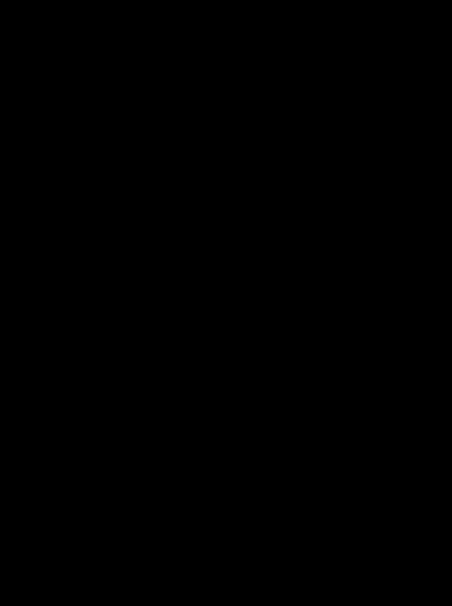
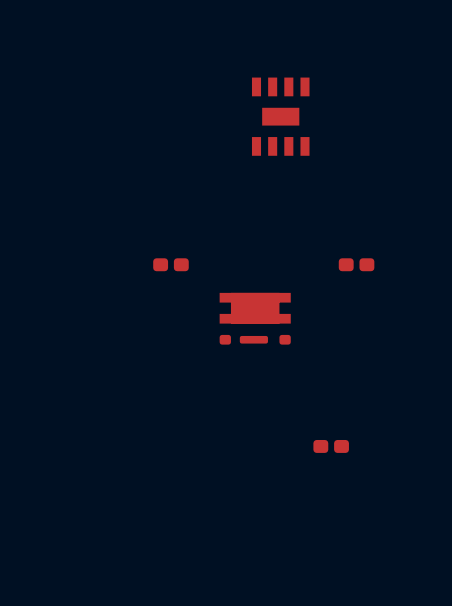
part: none -> (280, 116)
part: none -> (170, 264)
part: none -> (356, 264)
part: none -> (255, 318)
part: none -> (331, 446)

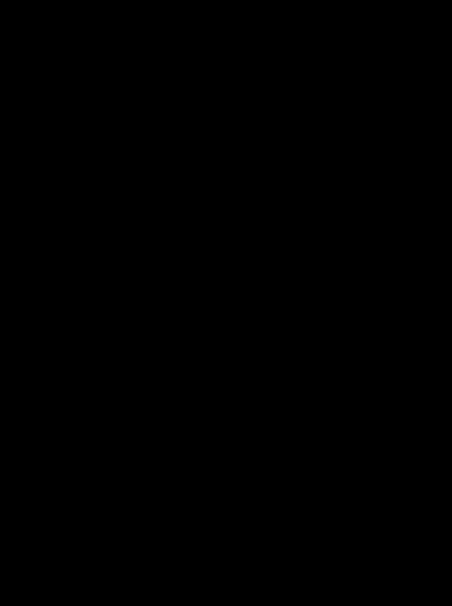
part: (280, 116) -> none
part: (170, 264) -> none
part: (356, 264) -> none
part: (255, 318) -> none
part: (331, 446) -> none

